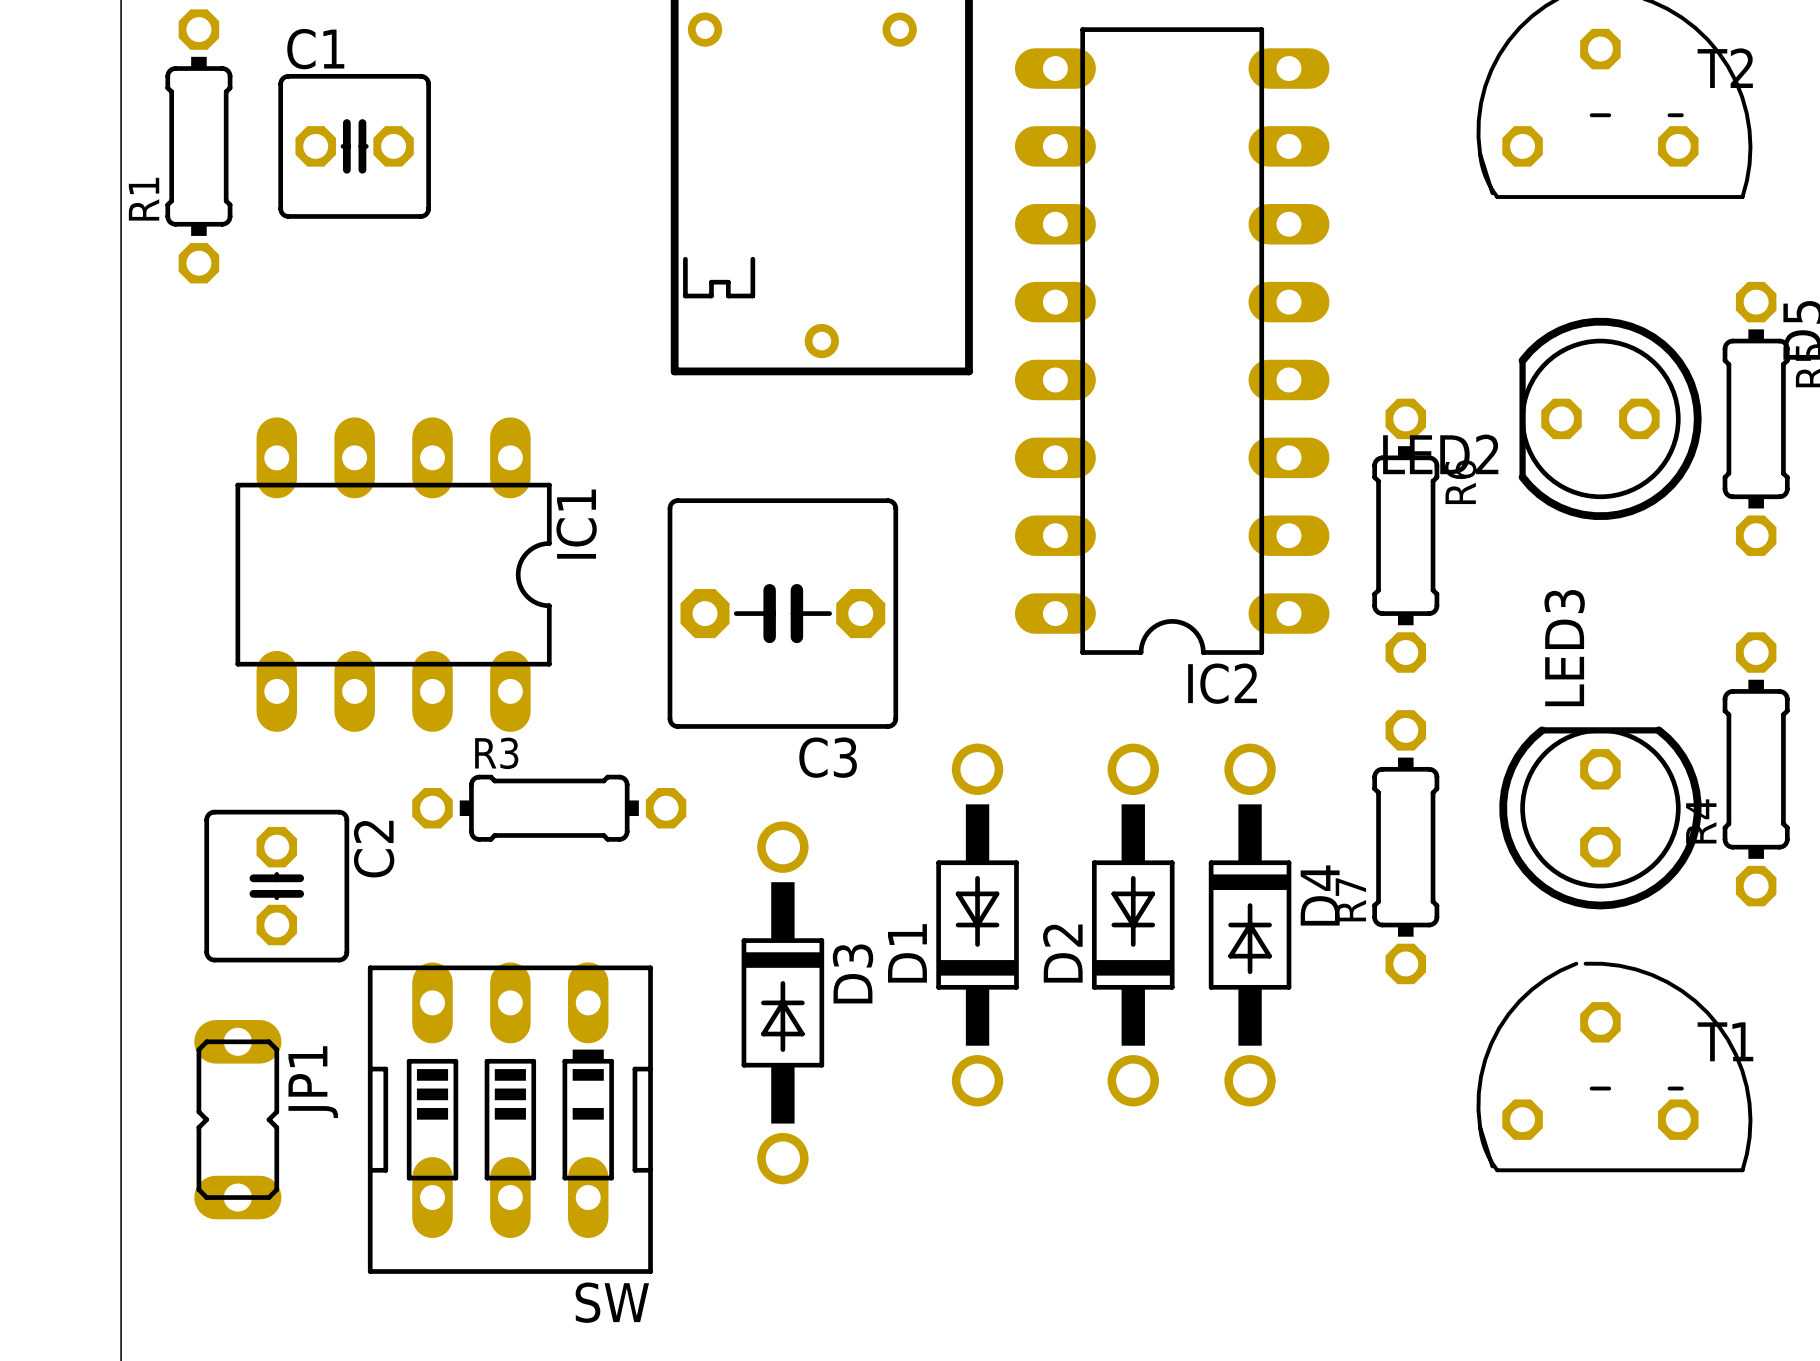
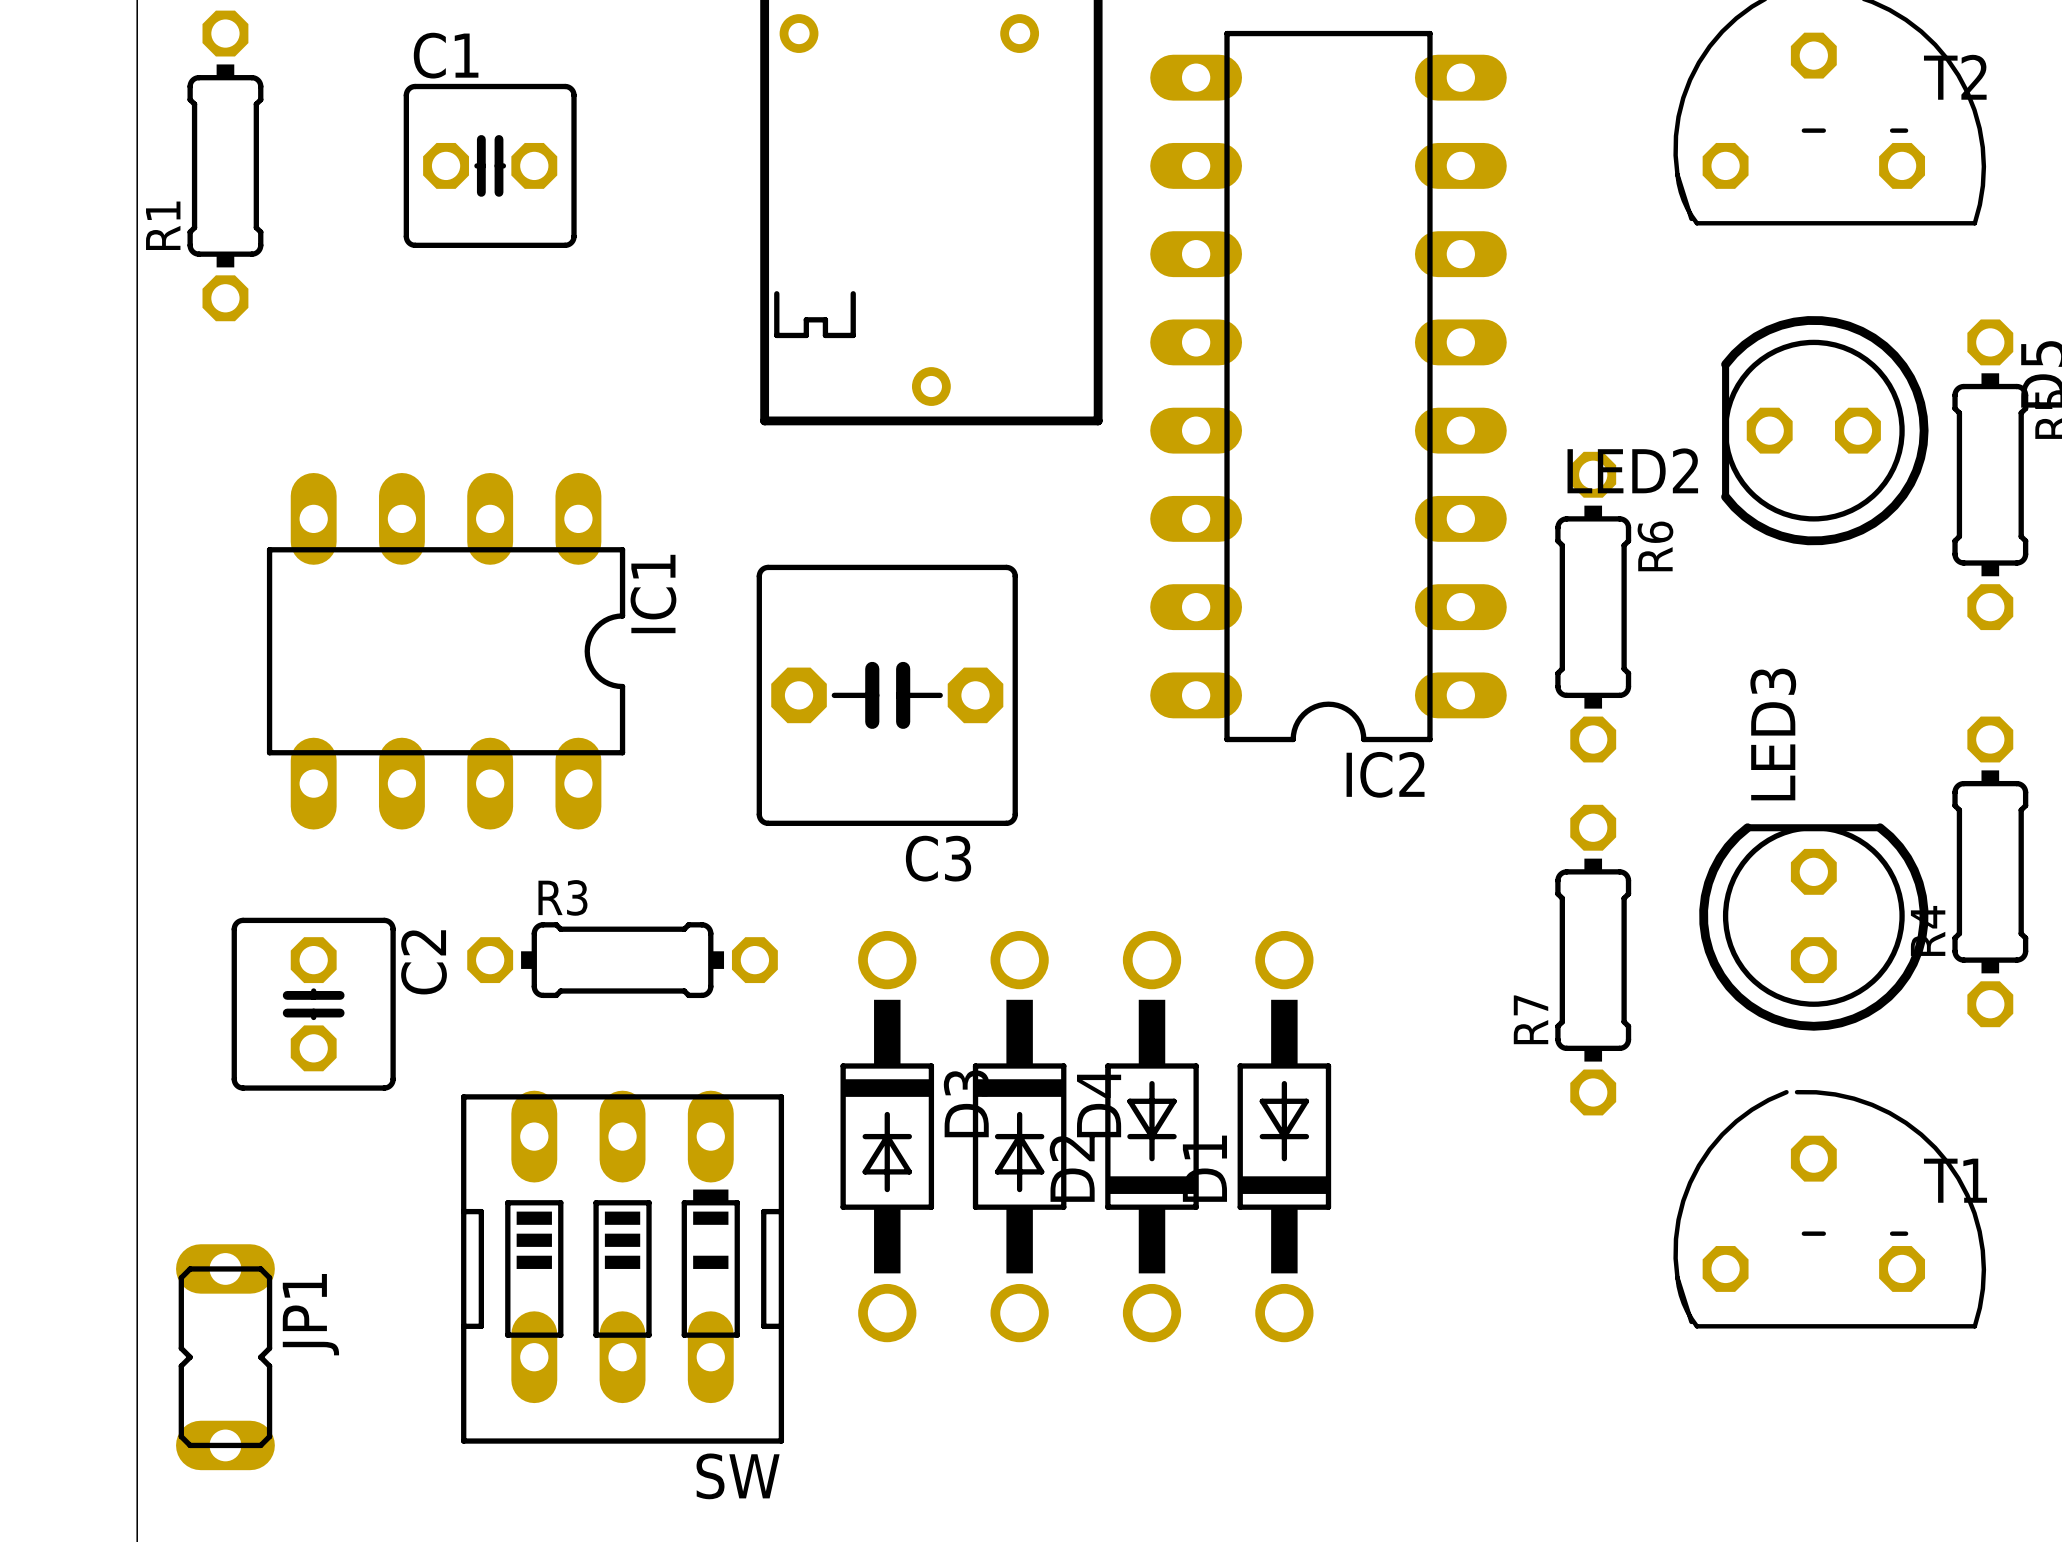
C1 position: (354, 146) -> (490, 165)
LED2 position: (1610, 418) -> (1824, 430)
R3 position: (549, 808) -> (622, 960)
D1 position: (977, 925) -> (1284, 1136)
D2 position: (1133, 925) -> (1152, 1136)
D4 position: (1250, 925) -> (1019, 1136)
SW position: (510, 1118) -> (622, 1267)
JP1 position: (237, 1119) -> (225, 1357)

